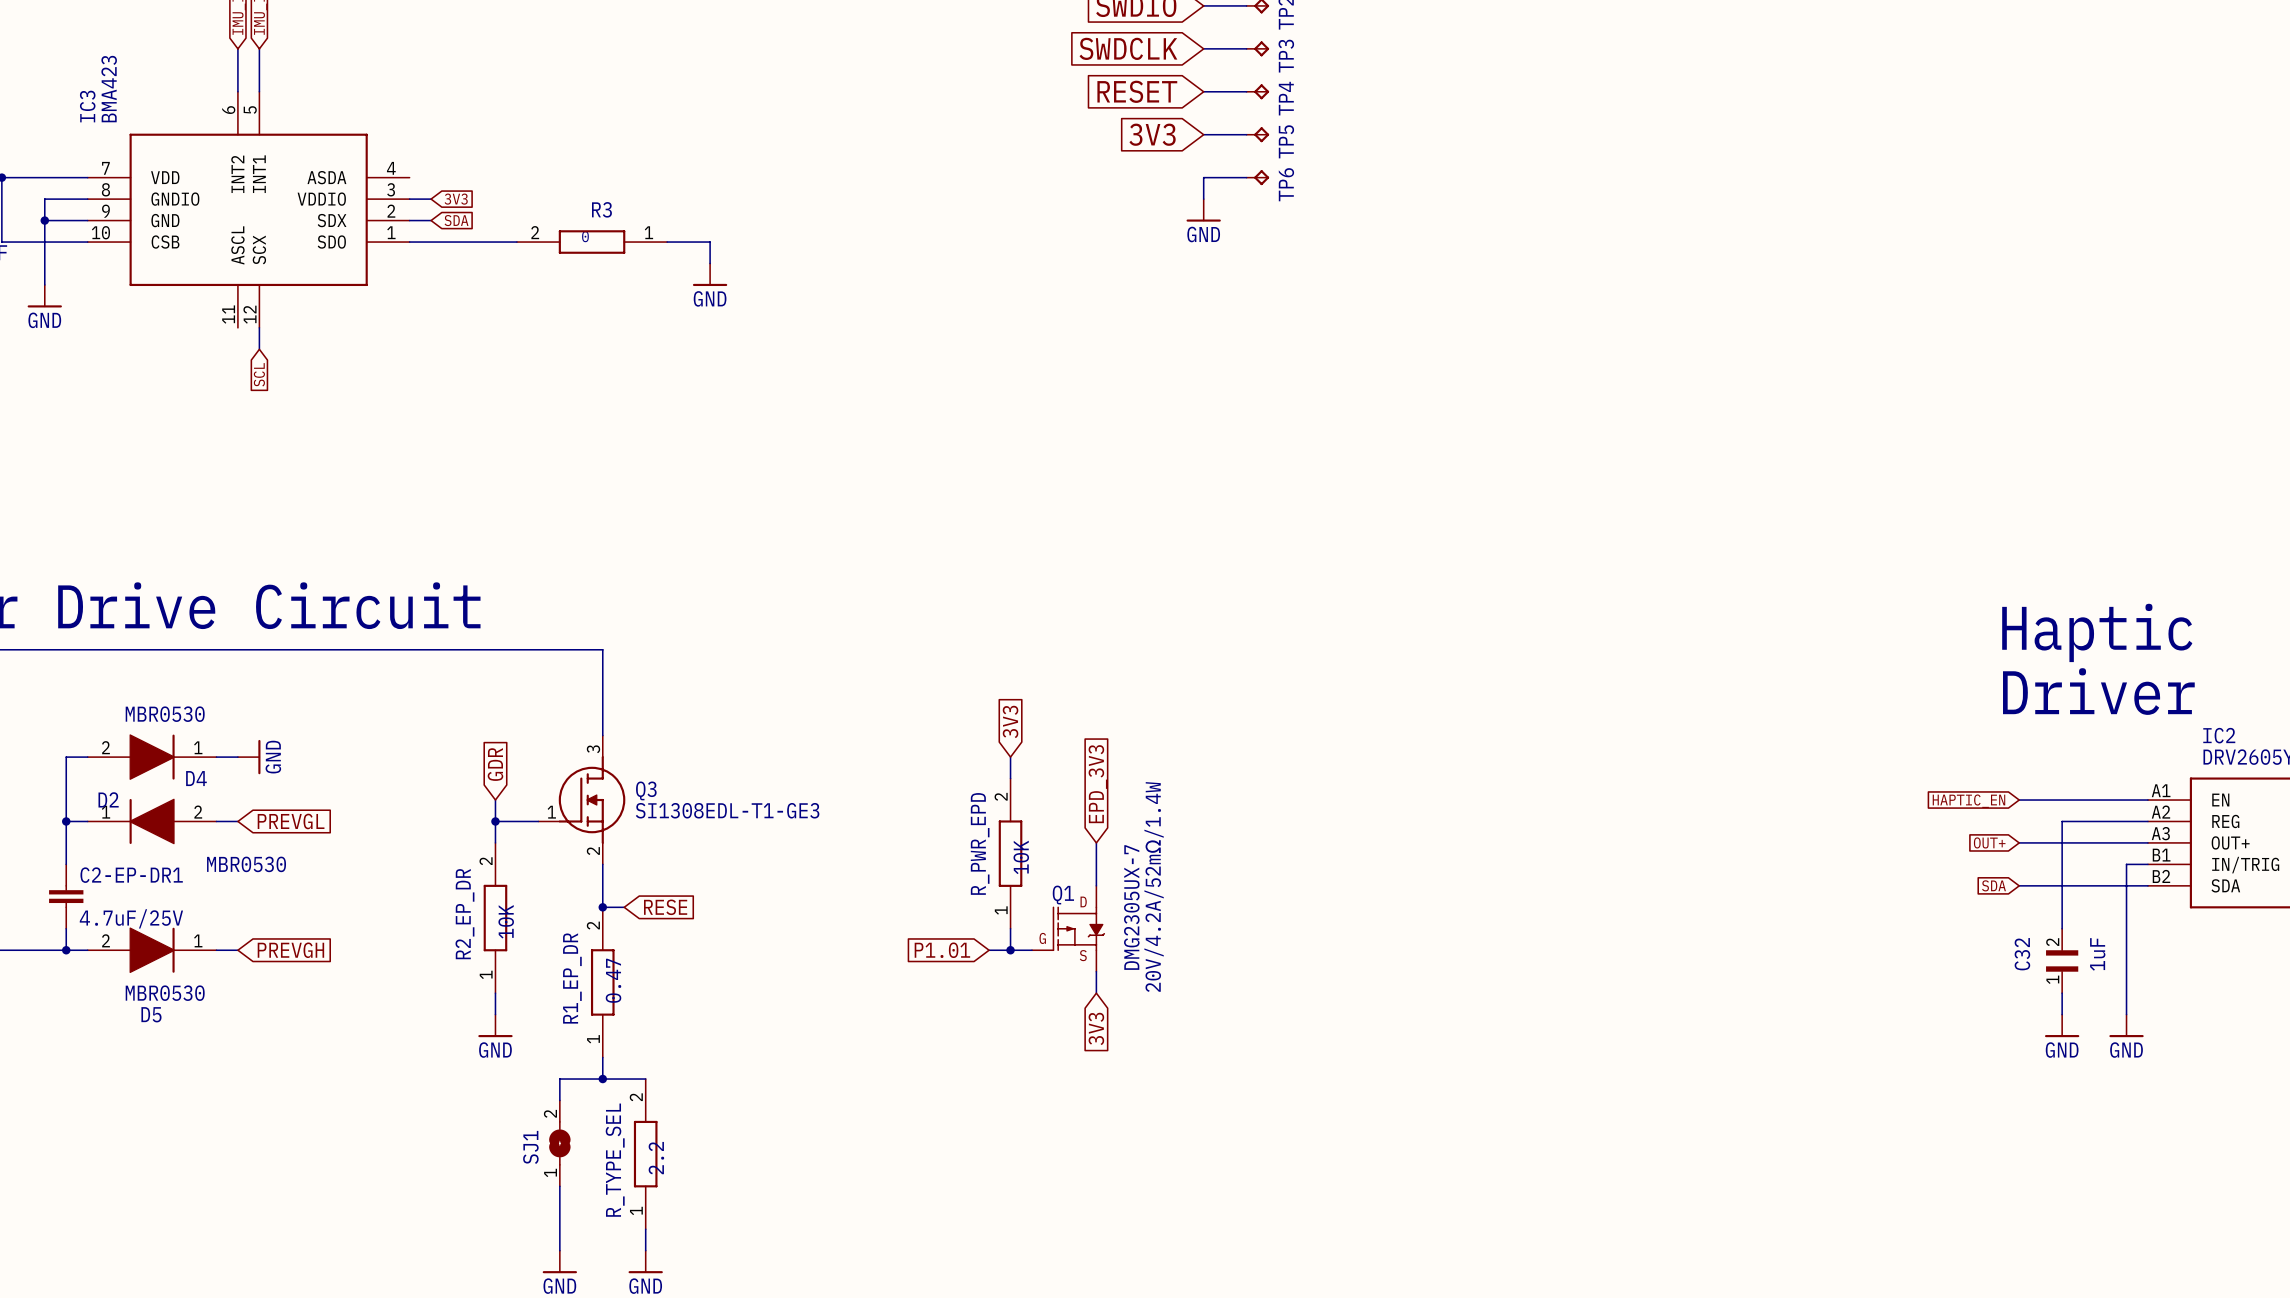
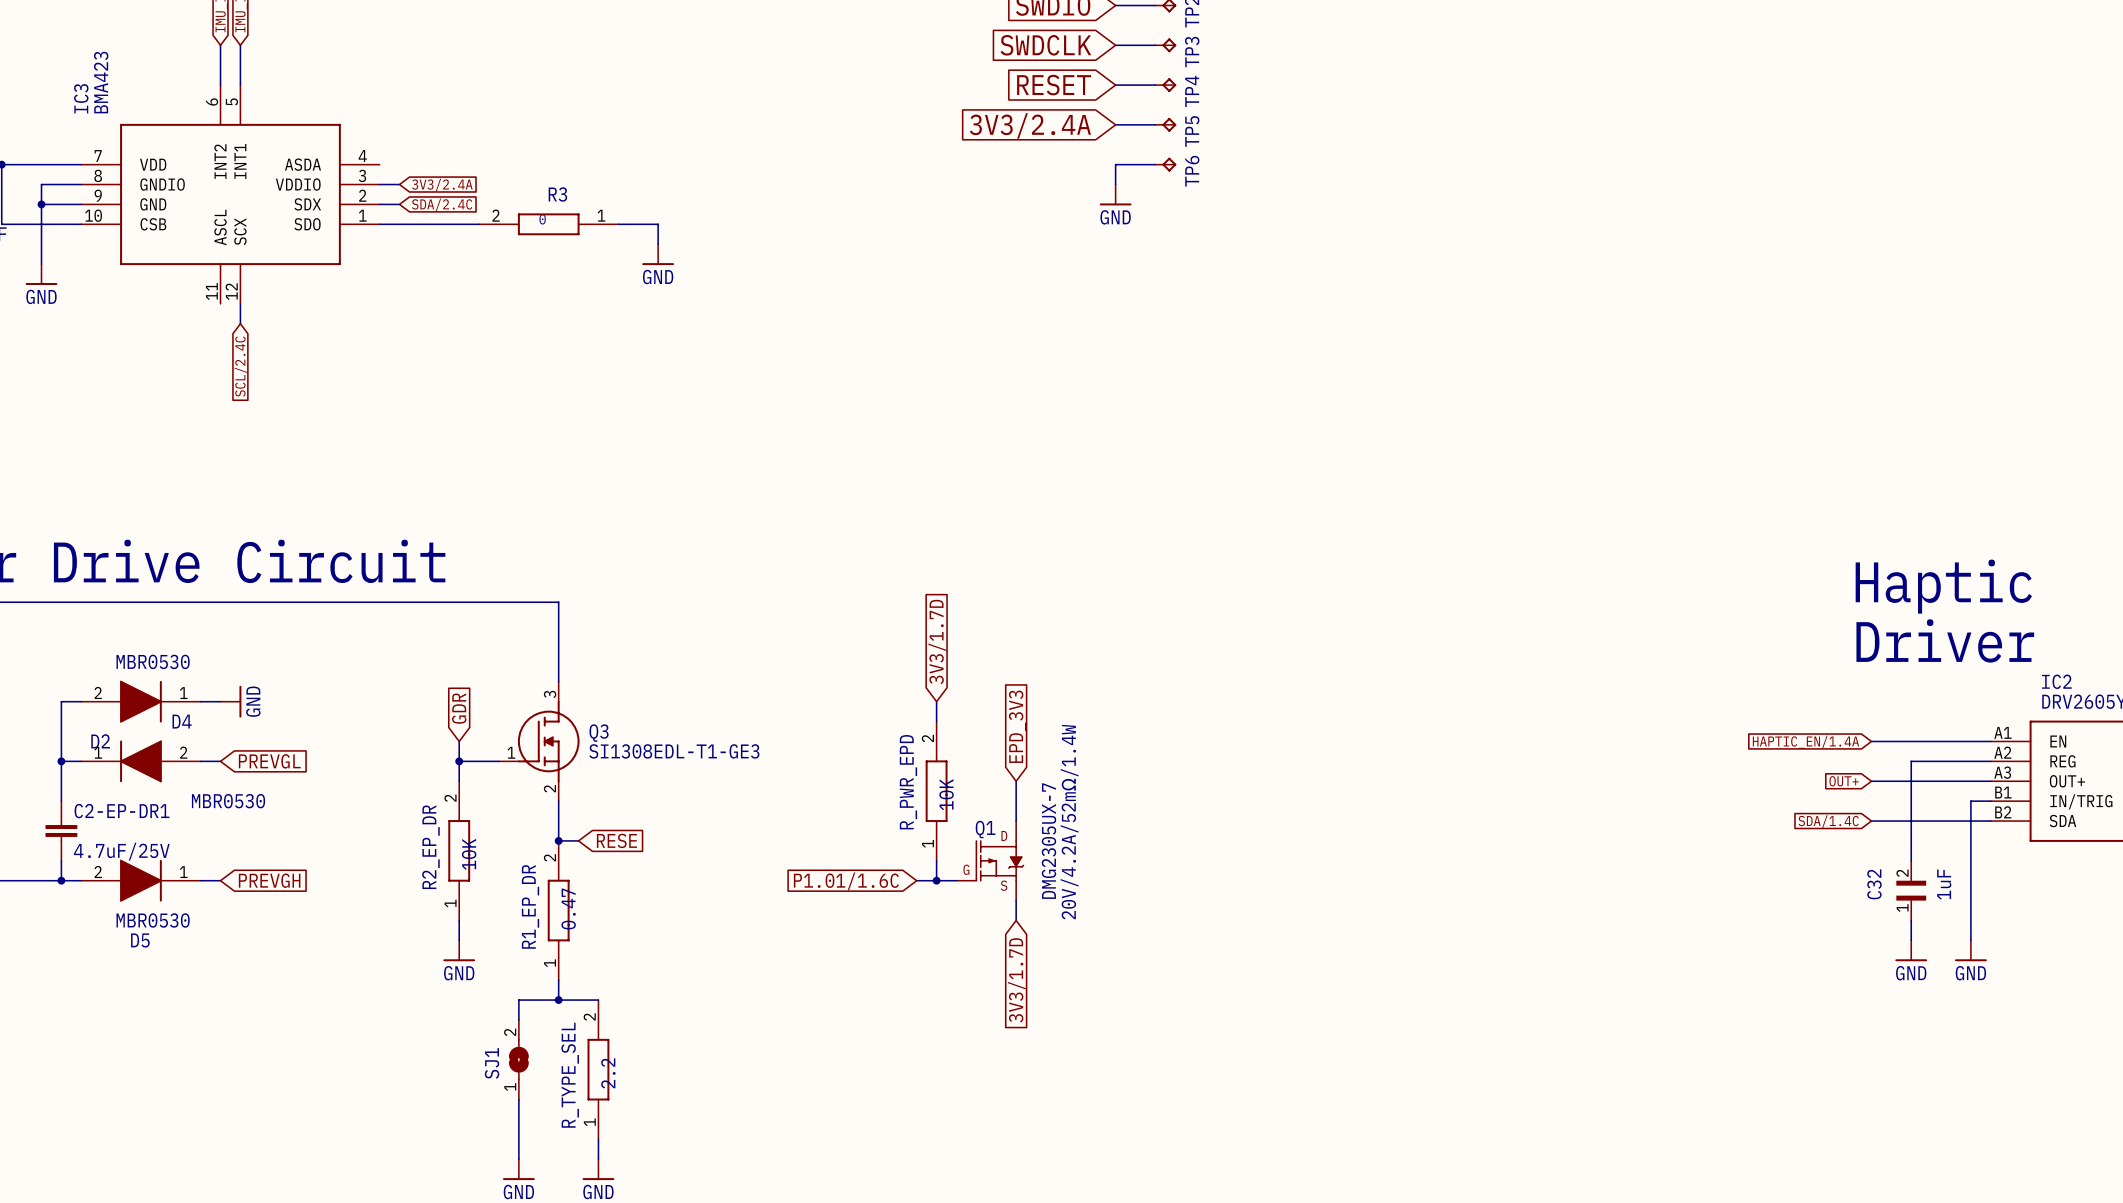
global label: 3V3 (1152, 134) -> 3V3/2.4A (1030, 125)
global label: 3V3 (456, 199) -> 3V3/2.4A (442, 185)
global label: SDA (456, 220) -> SDA/2.4C (442, 204)
global label: SCL (259, 374) -> SCL/2.4C (240, 366)
global label: 3V3 (1010, 721) -> 3V3/1.7D (937, 641)
global label: HAPTIC_EN (1968, 801) -> HAPTIC_EN/1.4A (1805, 742)
global label: SDA (1993, 885) -> SDA/1.4C (1828, 821)
global label: P1.01 (942, 950) -> P1.01/1.6C (846, 881)
global label: 3V3 (1096, 1028) -> 3V3/1.7D (1016, 980)

